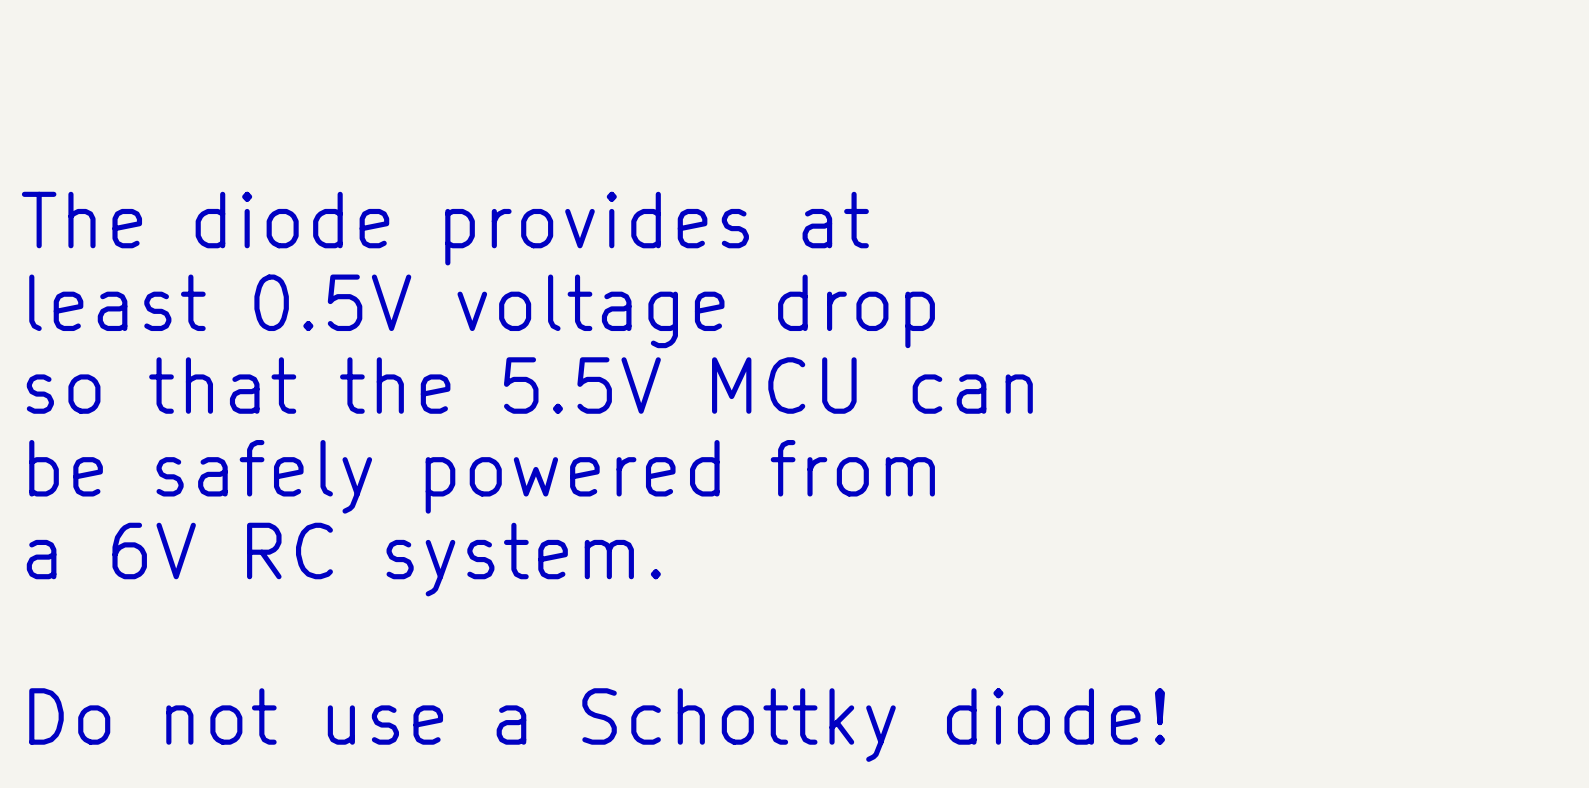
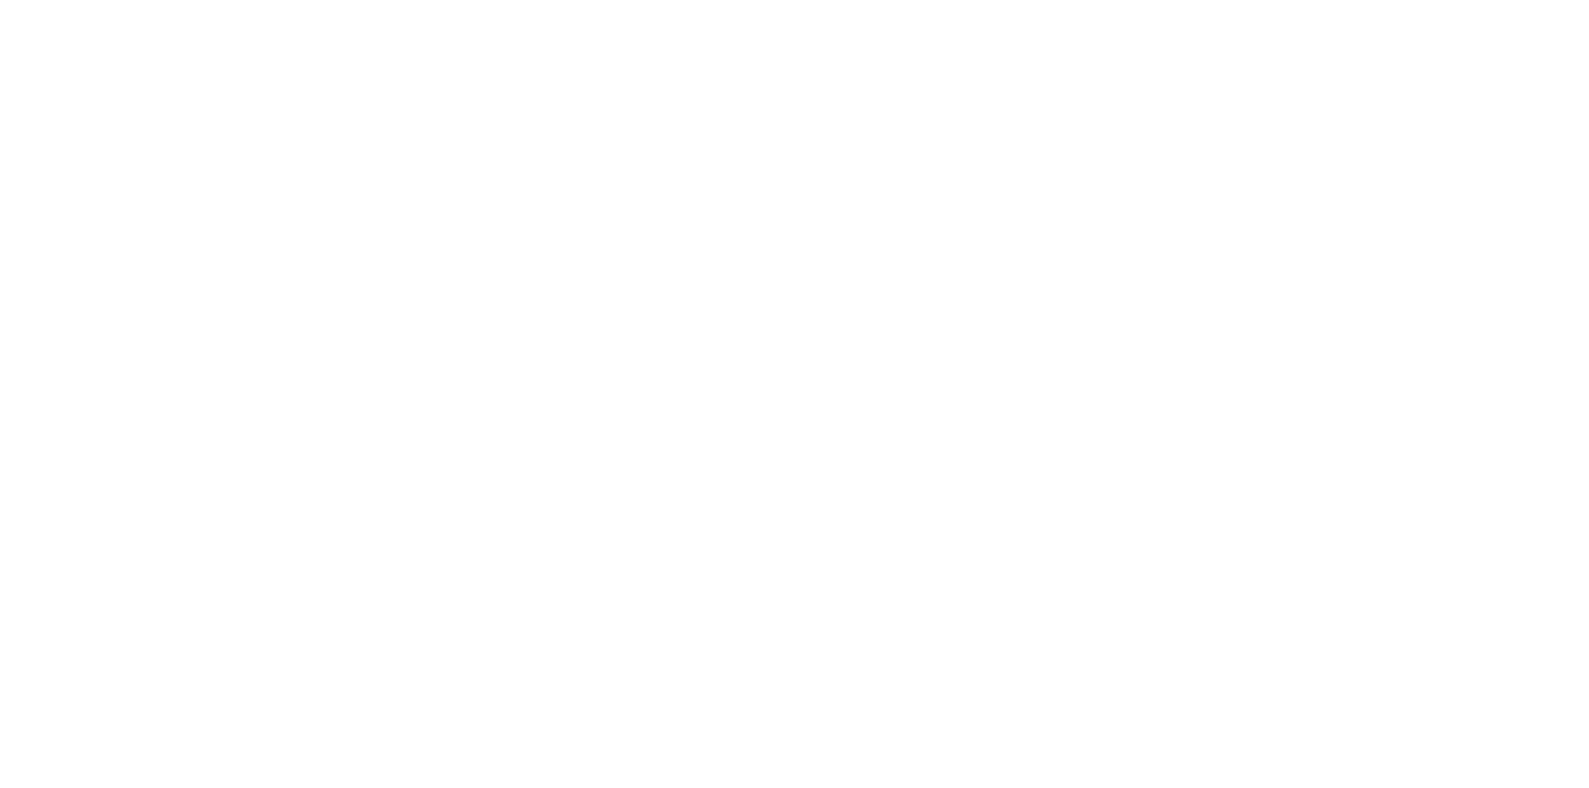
text: The diode provides at (445, 228) -> none
text: least 0.5V voltage drop (482, 311) -> none
text: so that the 5.5V MCU can (529, 385) -> none
text: be safely powered from (482, 476) -> none
text: a 6V RC system. (343, 559) -> none
text: Do not use a Schottky diode! (597, 725) -> none

